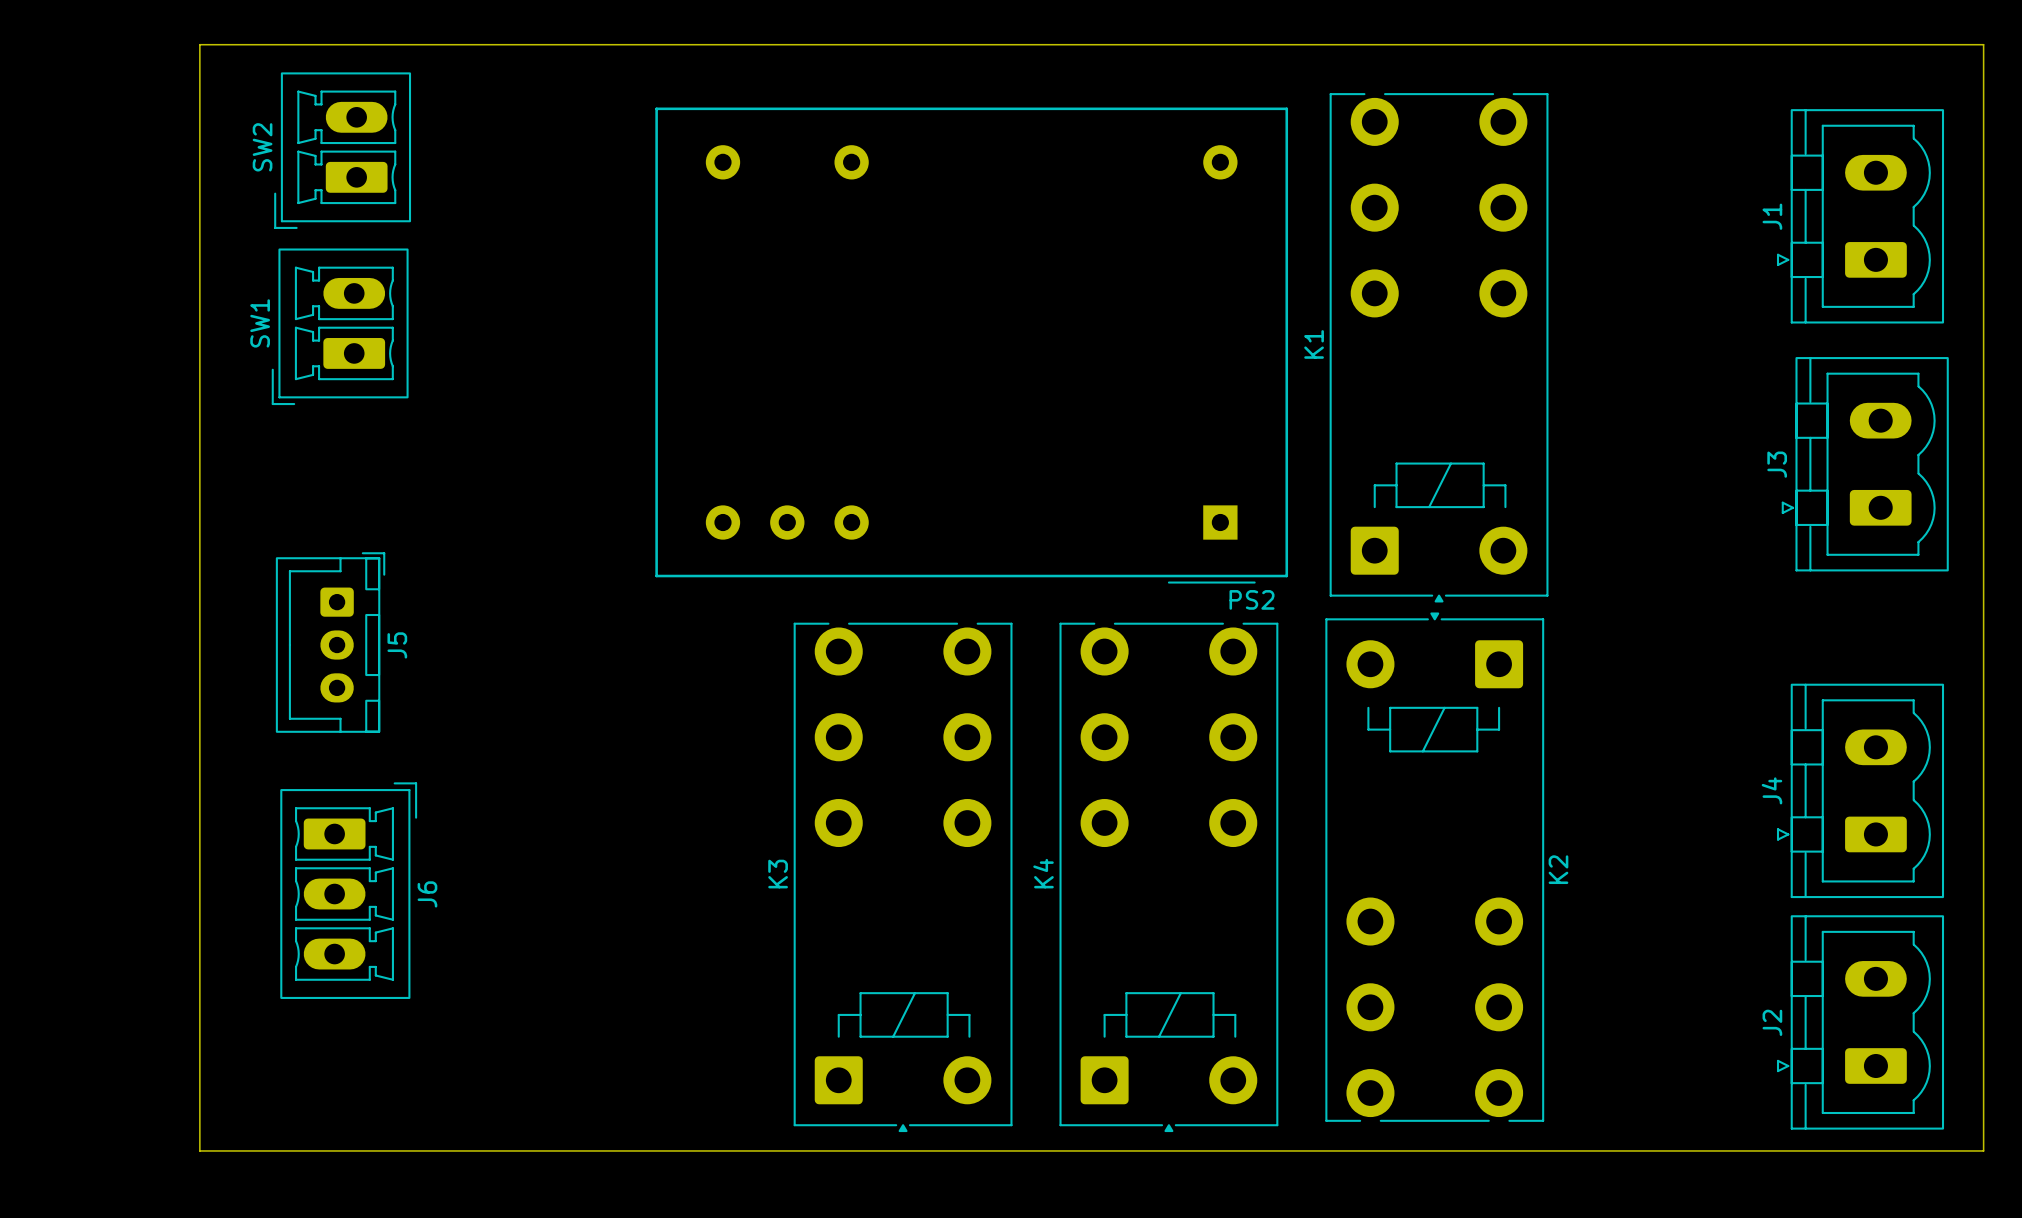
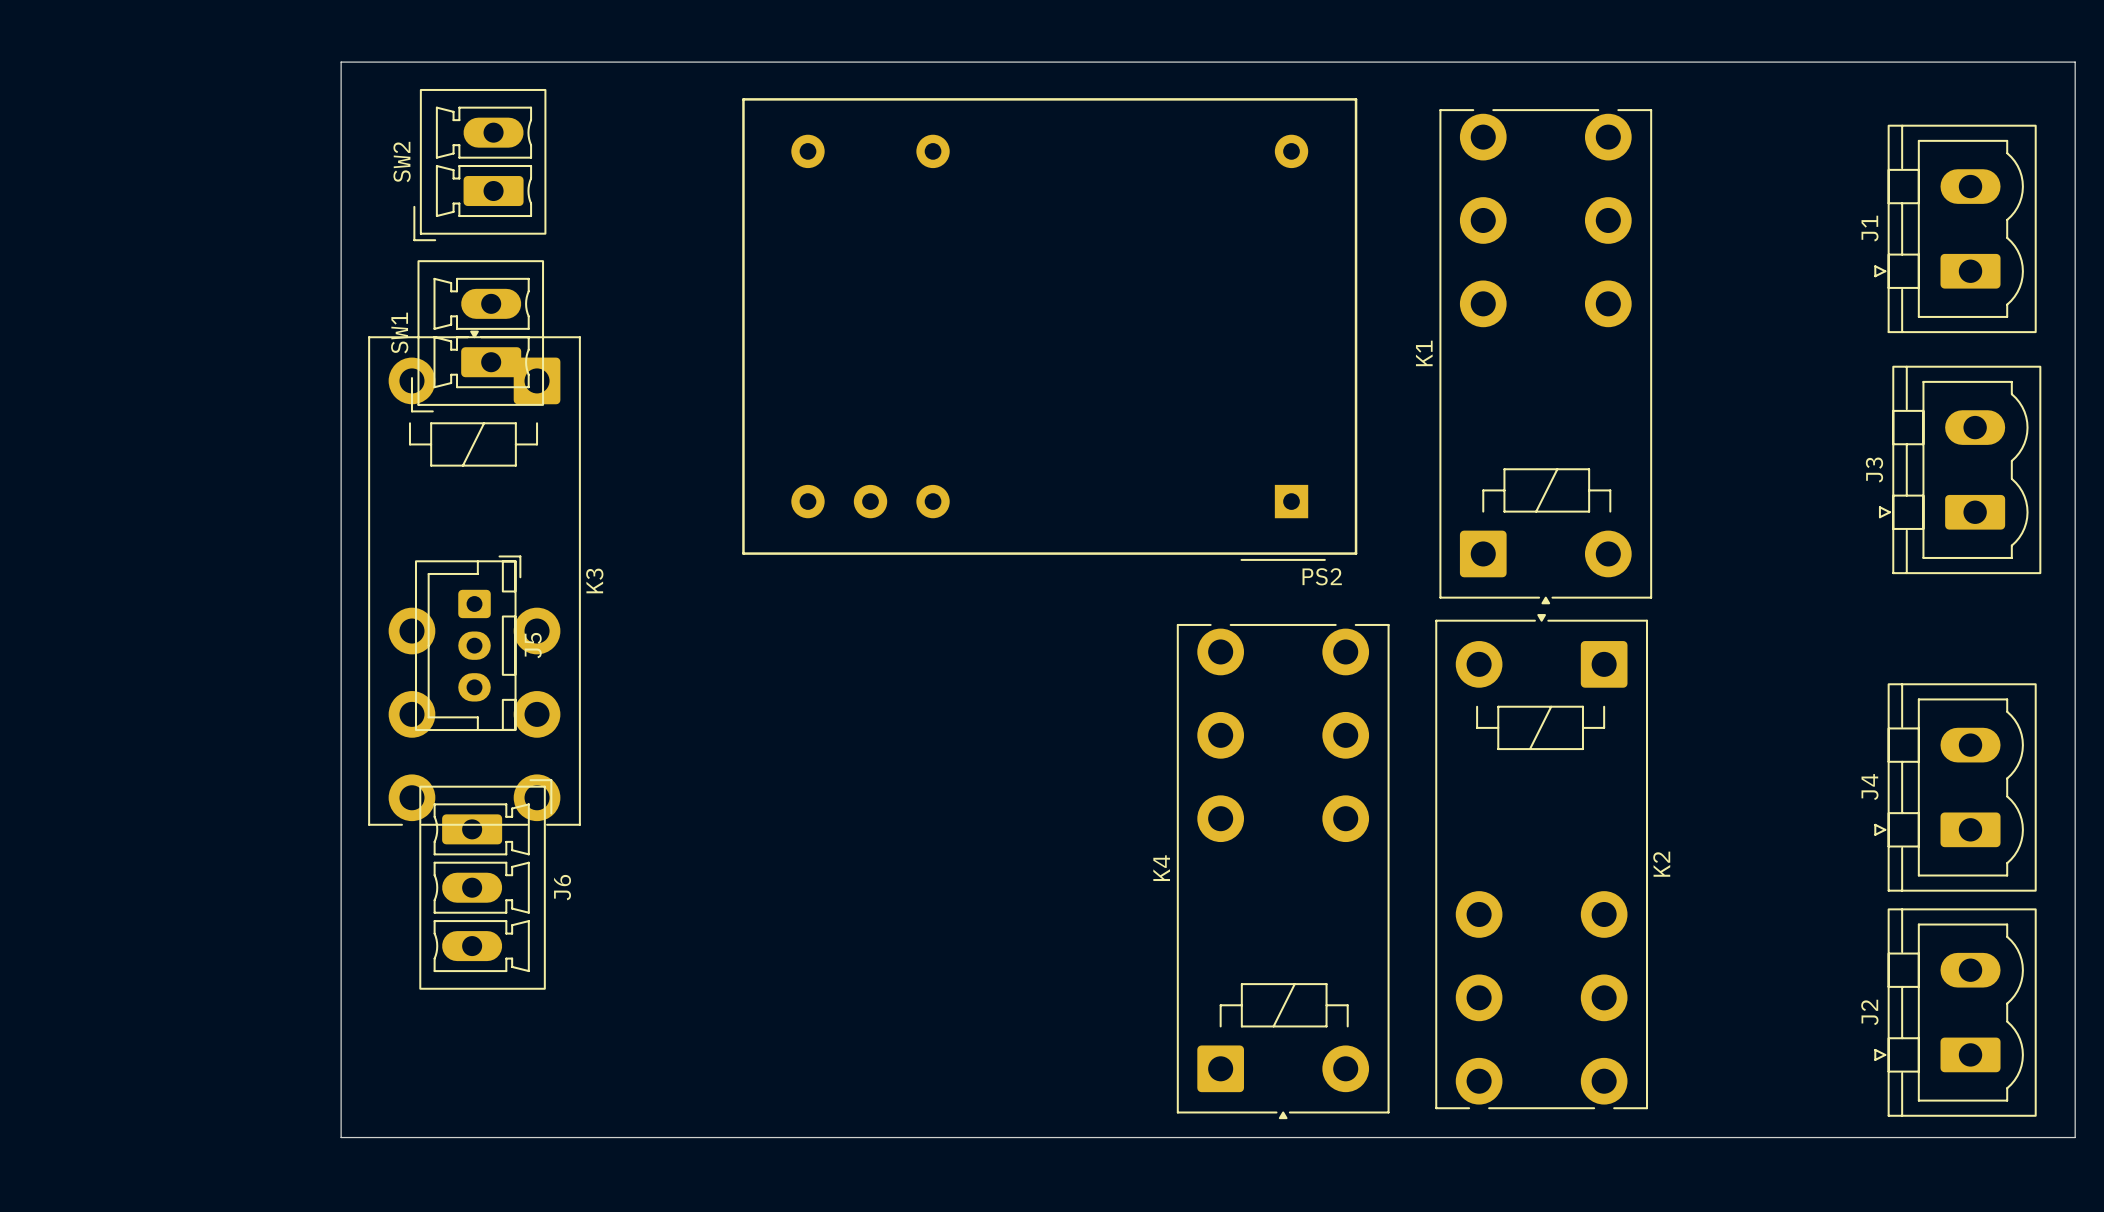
PS2 position: (971, 345) -> (1049, 329)
K3 rotation: 0° (903, 877) -> 180° (474, 578)
K3 position: (903, 877) -> (474, 578)

